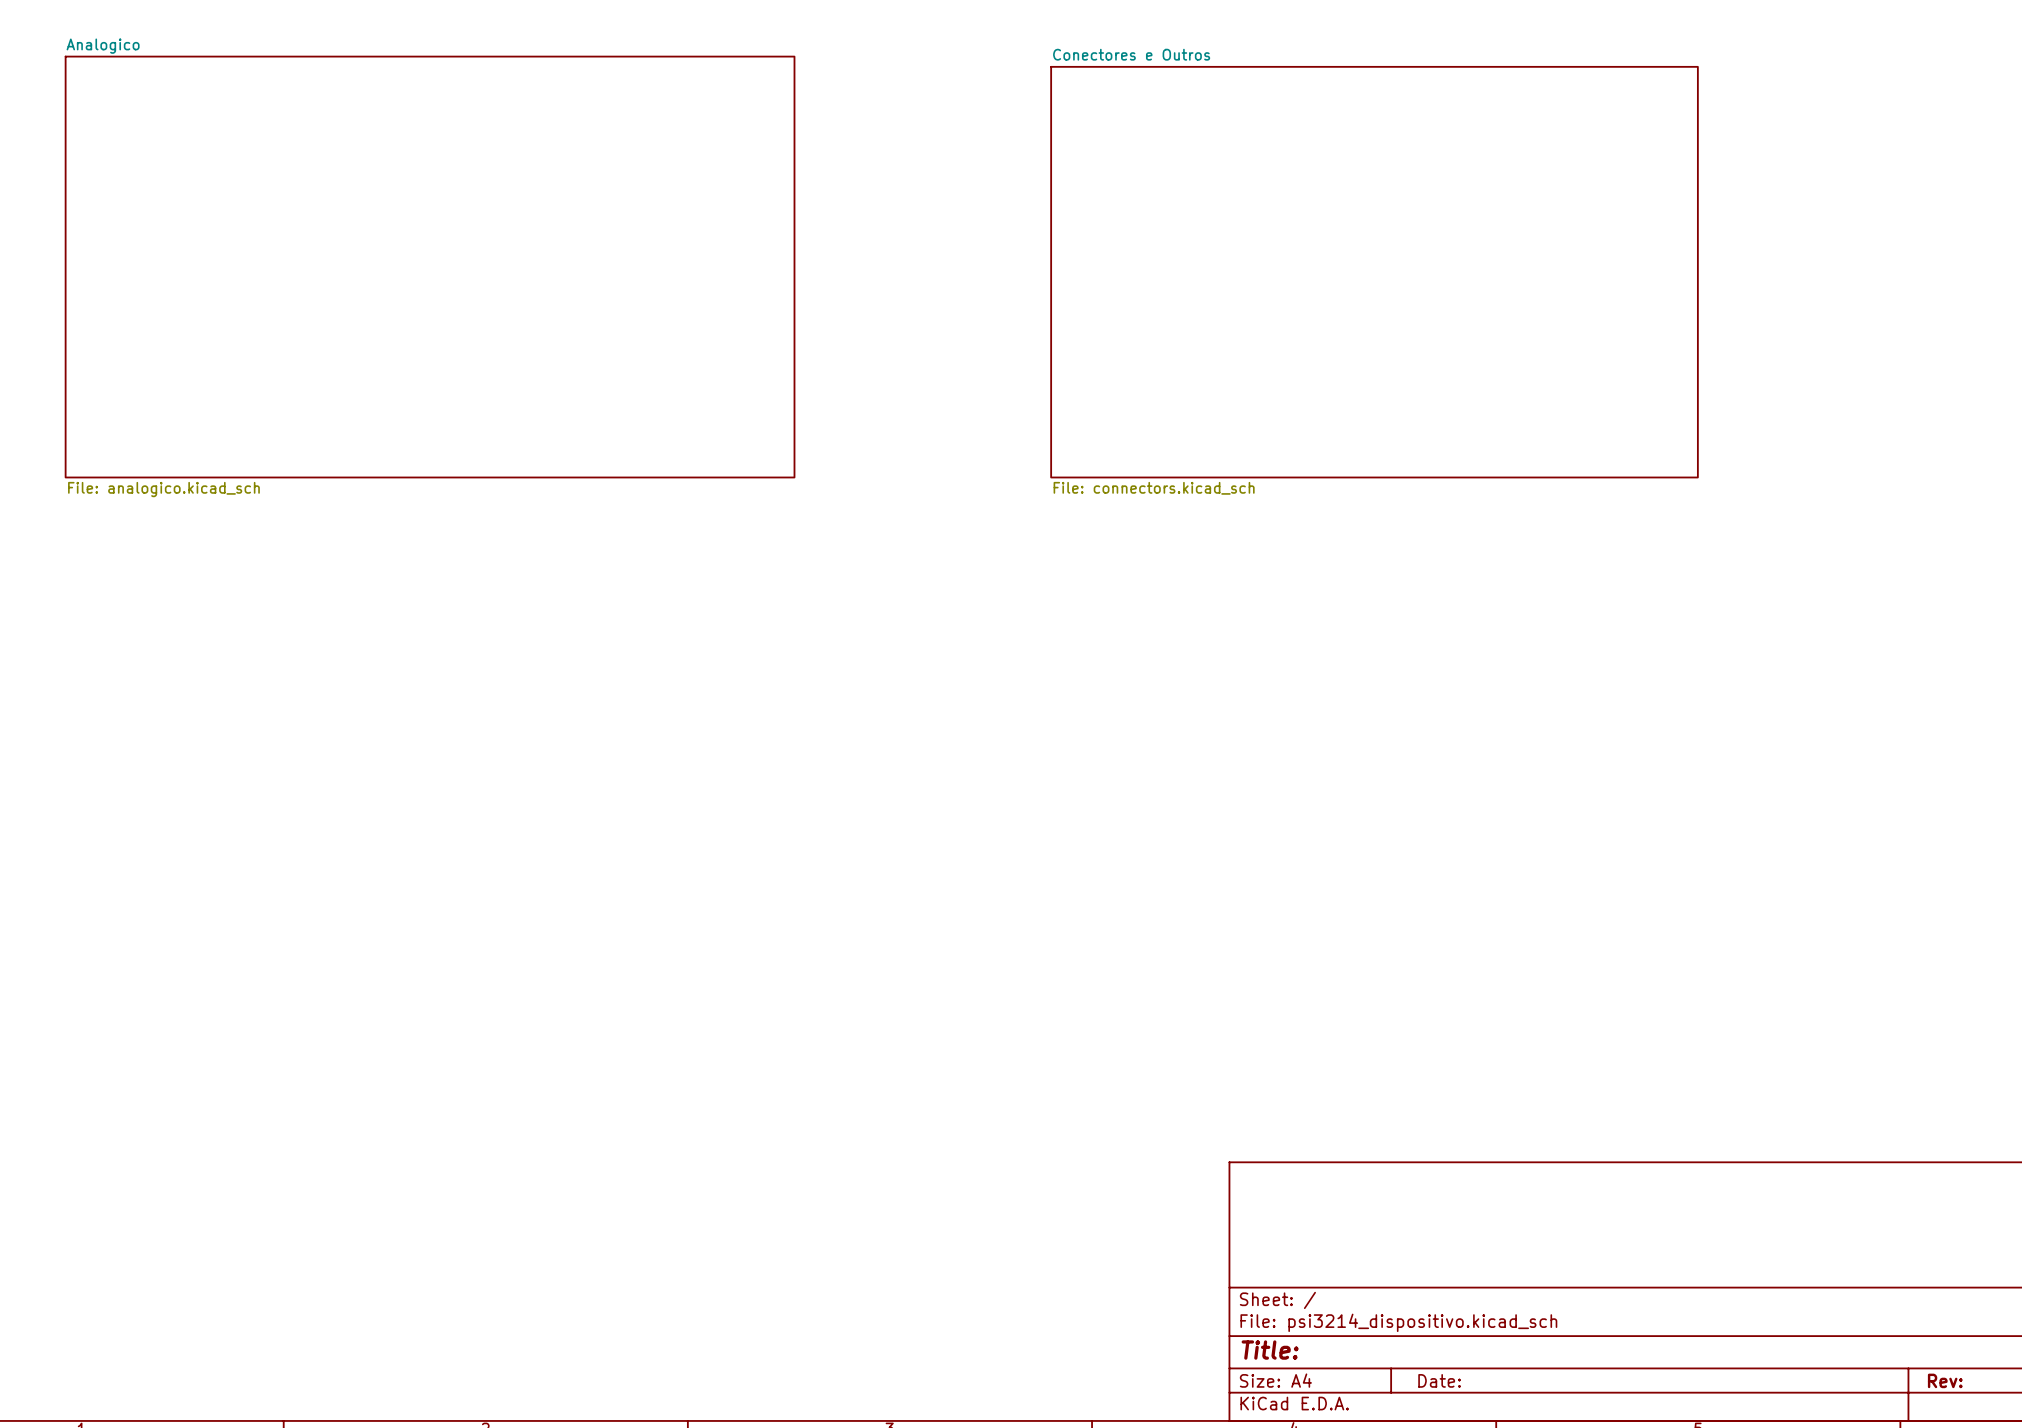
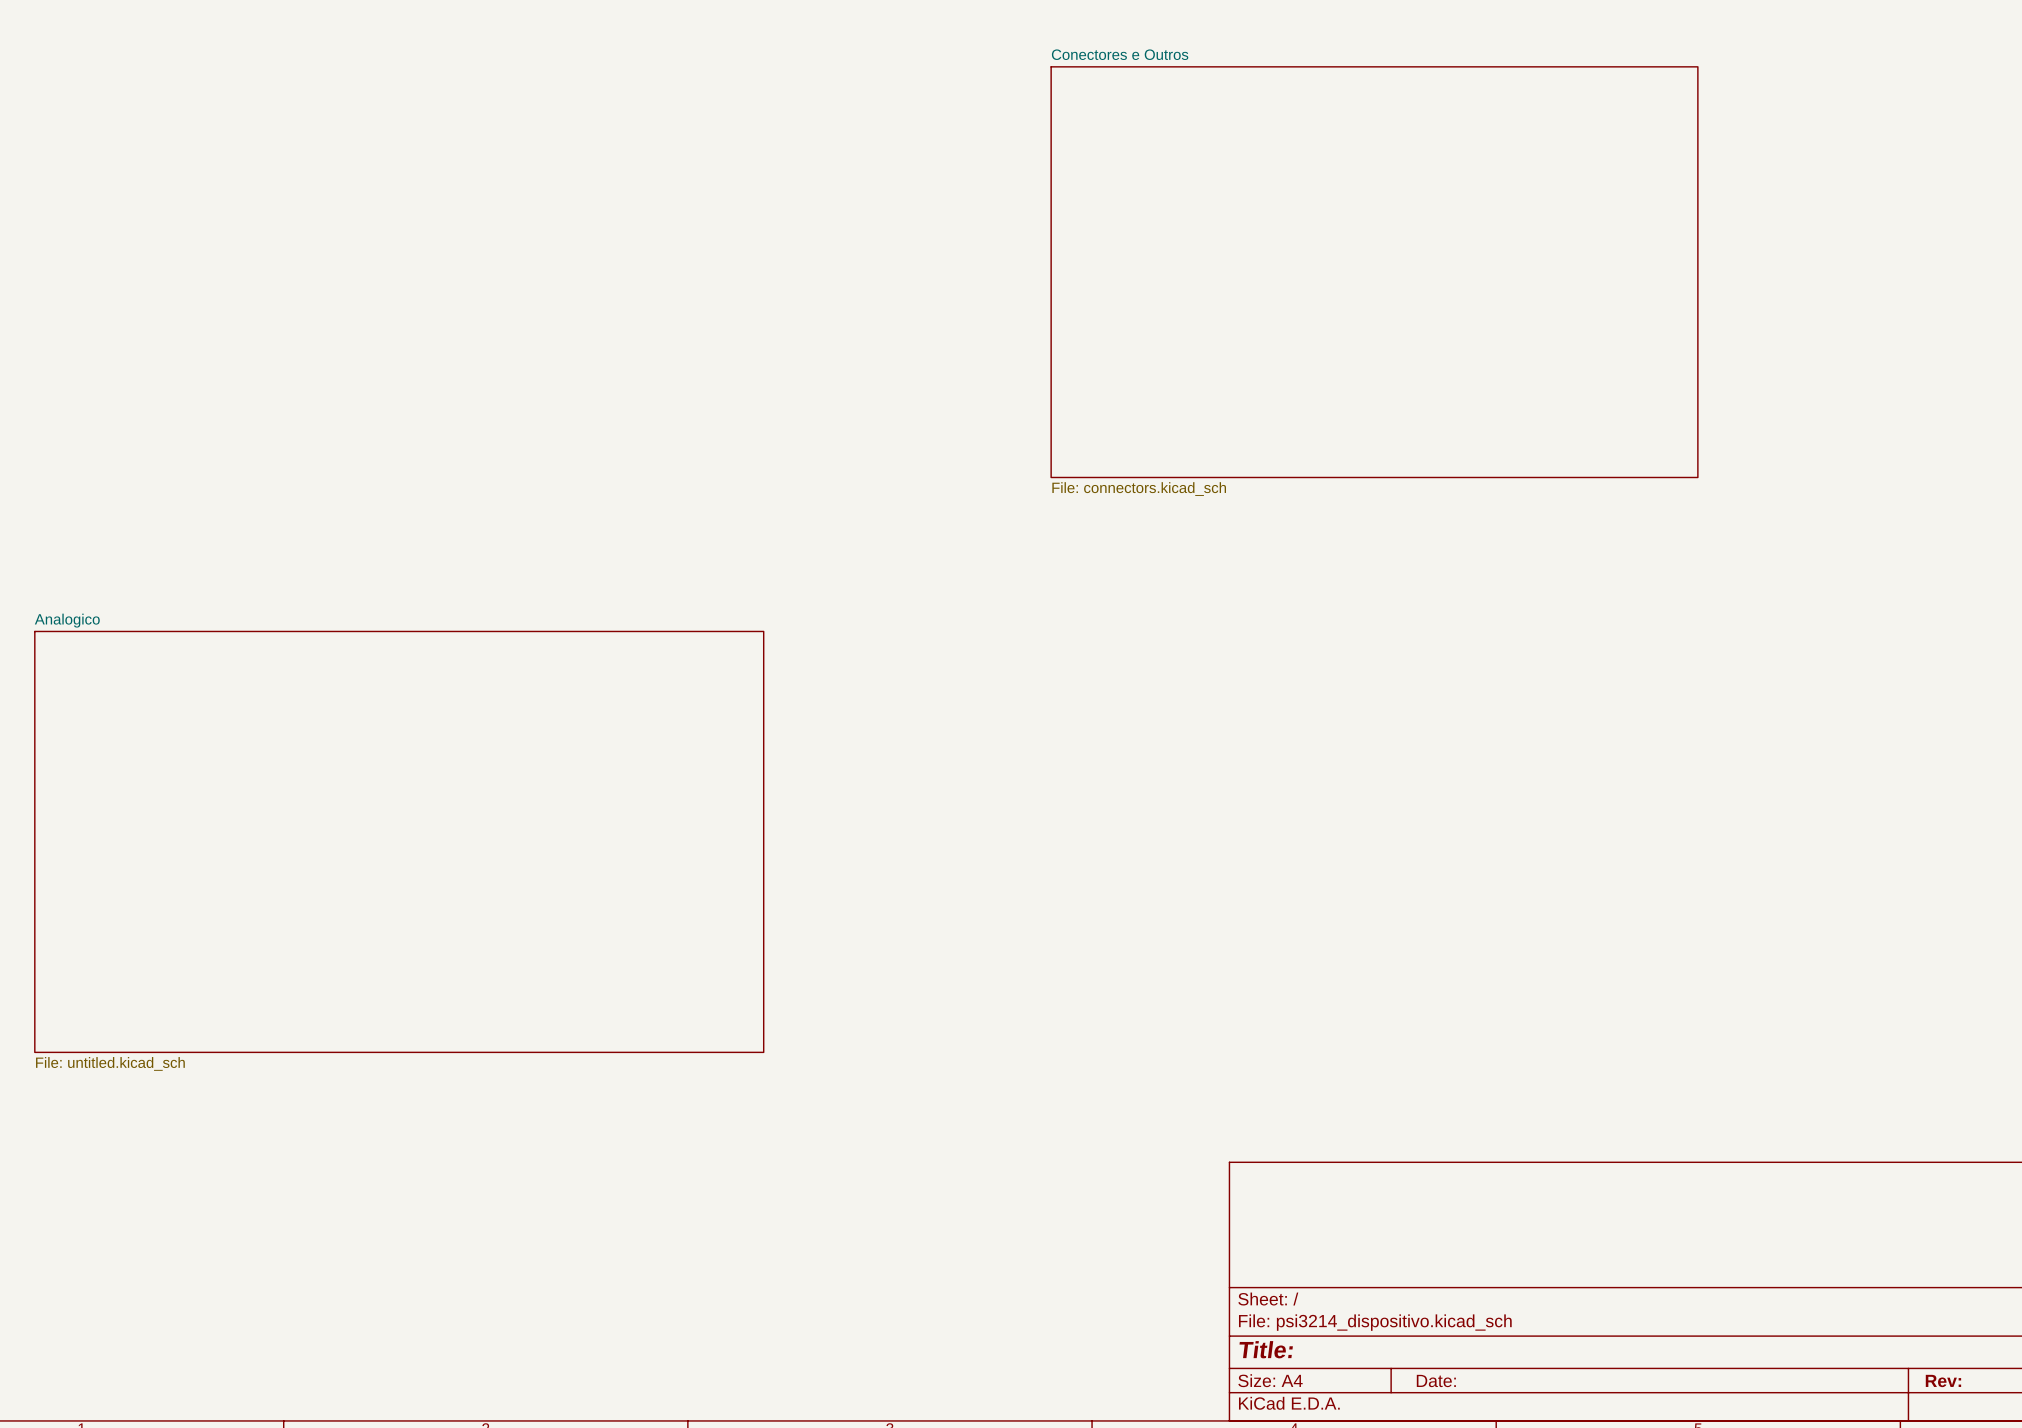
sheet Analogico: File: analogico.kicad_sch (430, 267) -> none
sheet Analogico: none -> File: untitled.kicad_sch (399, 841)

